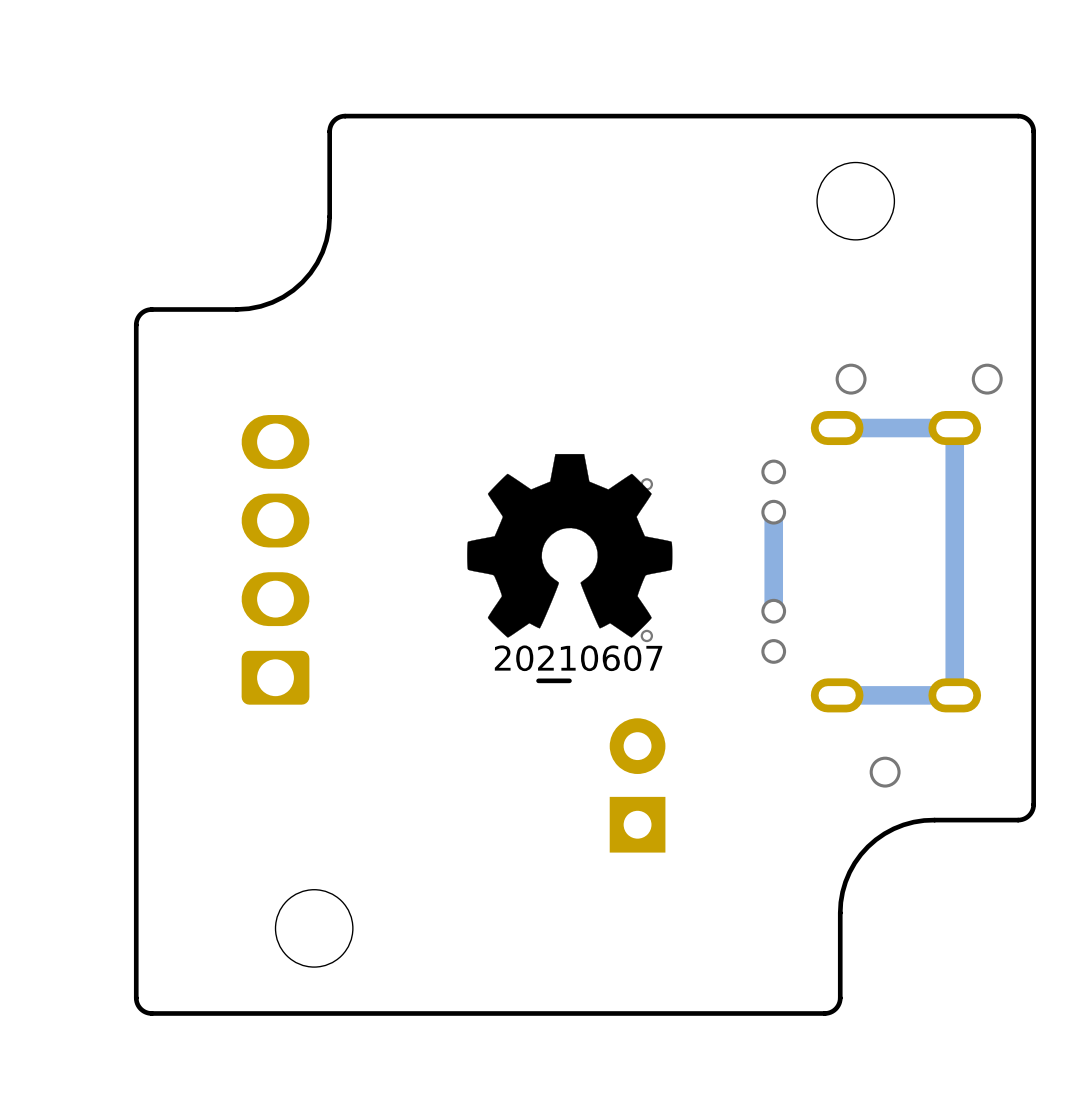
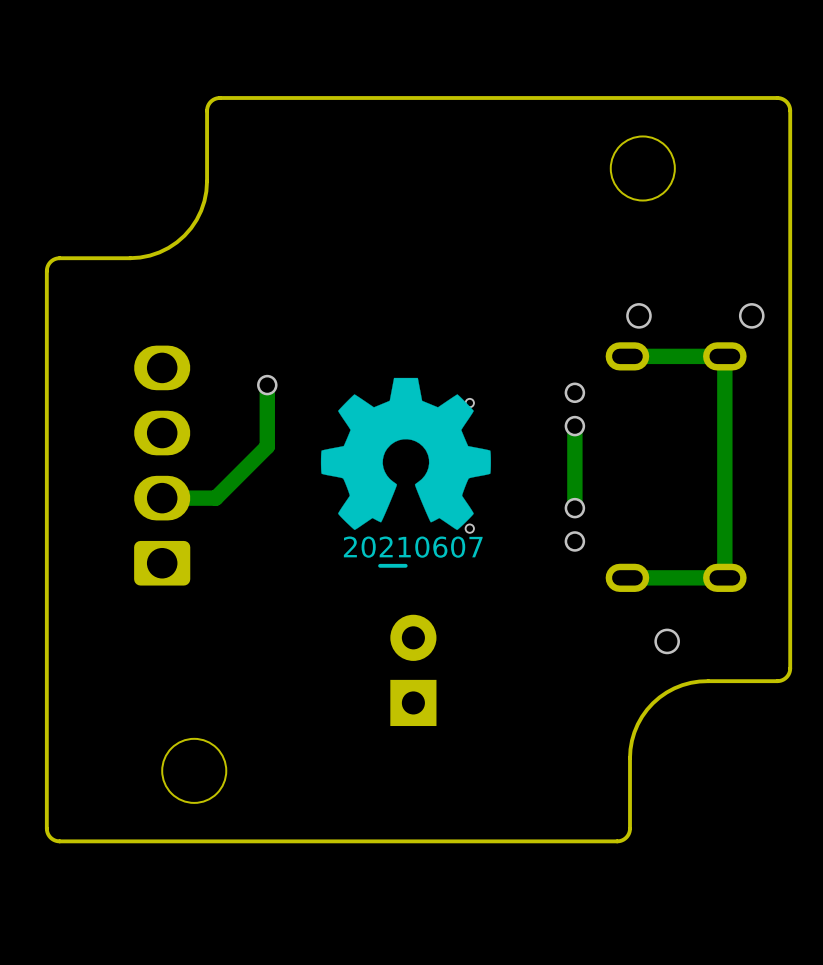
track: none -> (267, 385) (267, 446) (215, 498) (162, 498)
via: none -> (267, 385)
part position: (637, 785) -> (413, 670)

